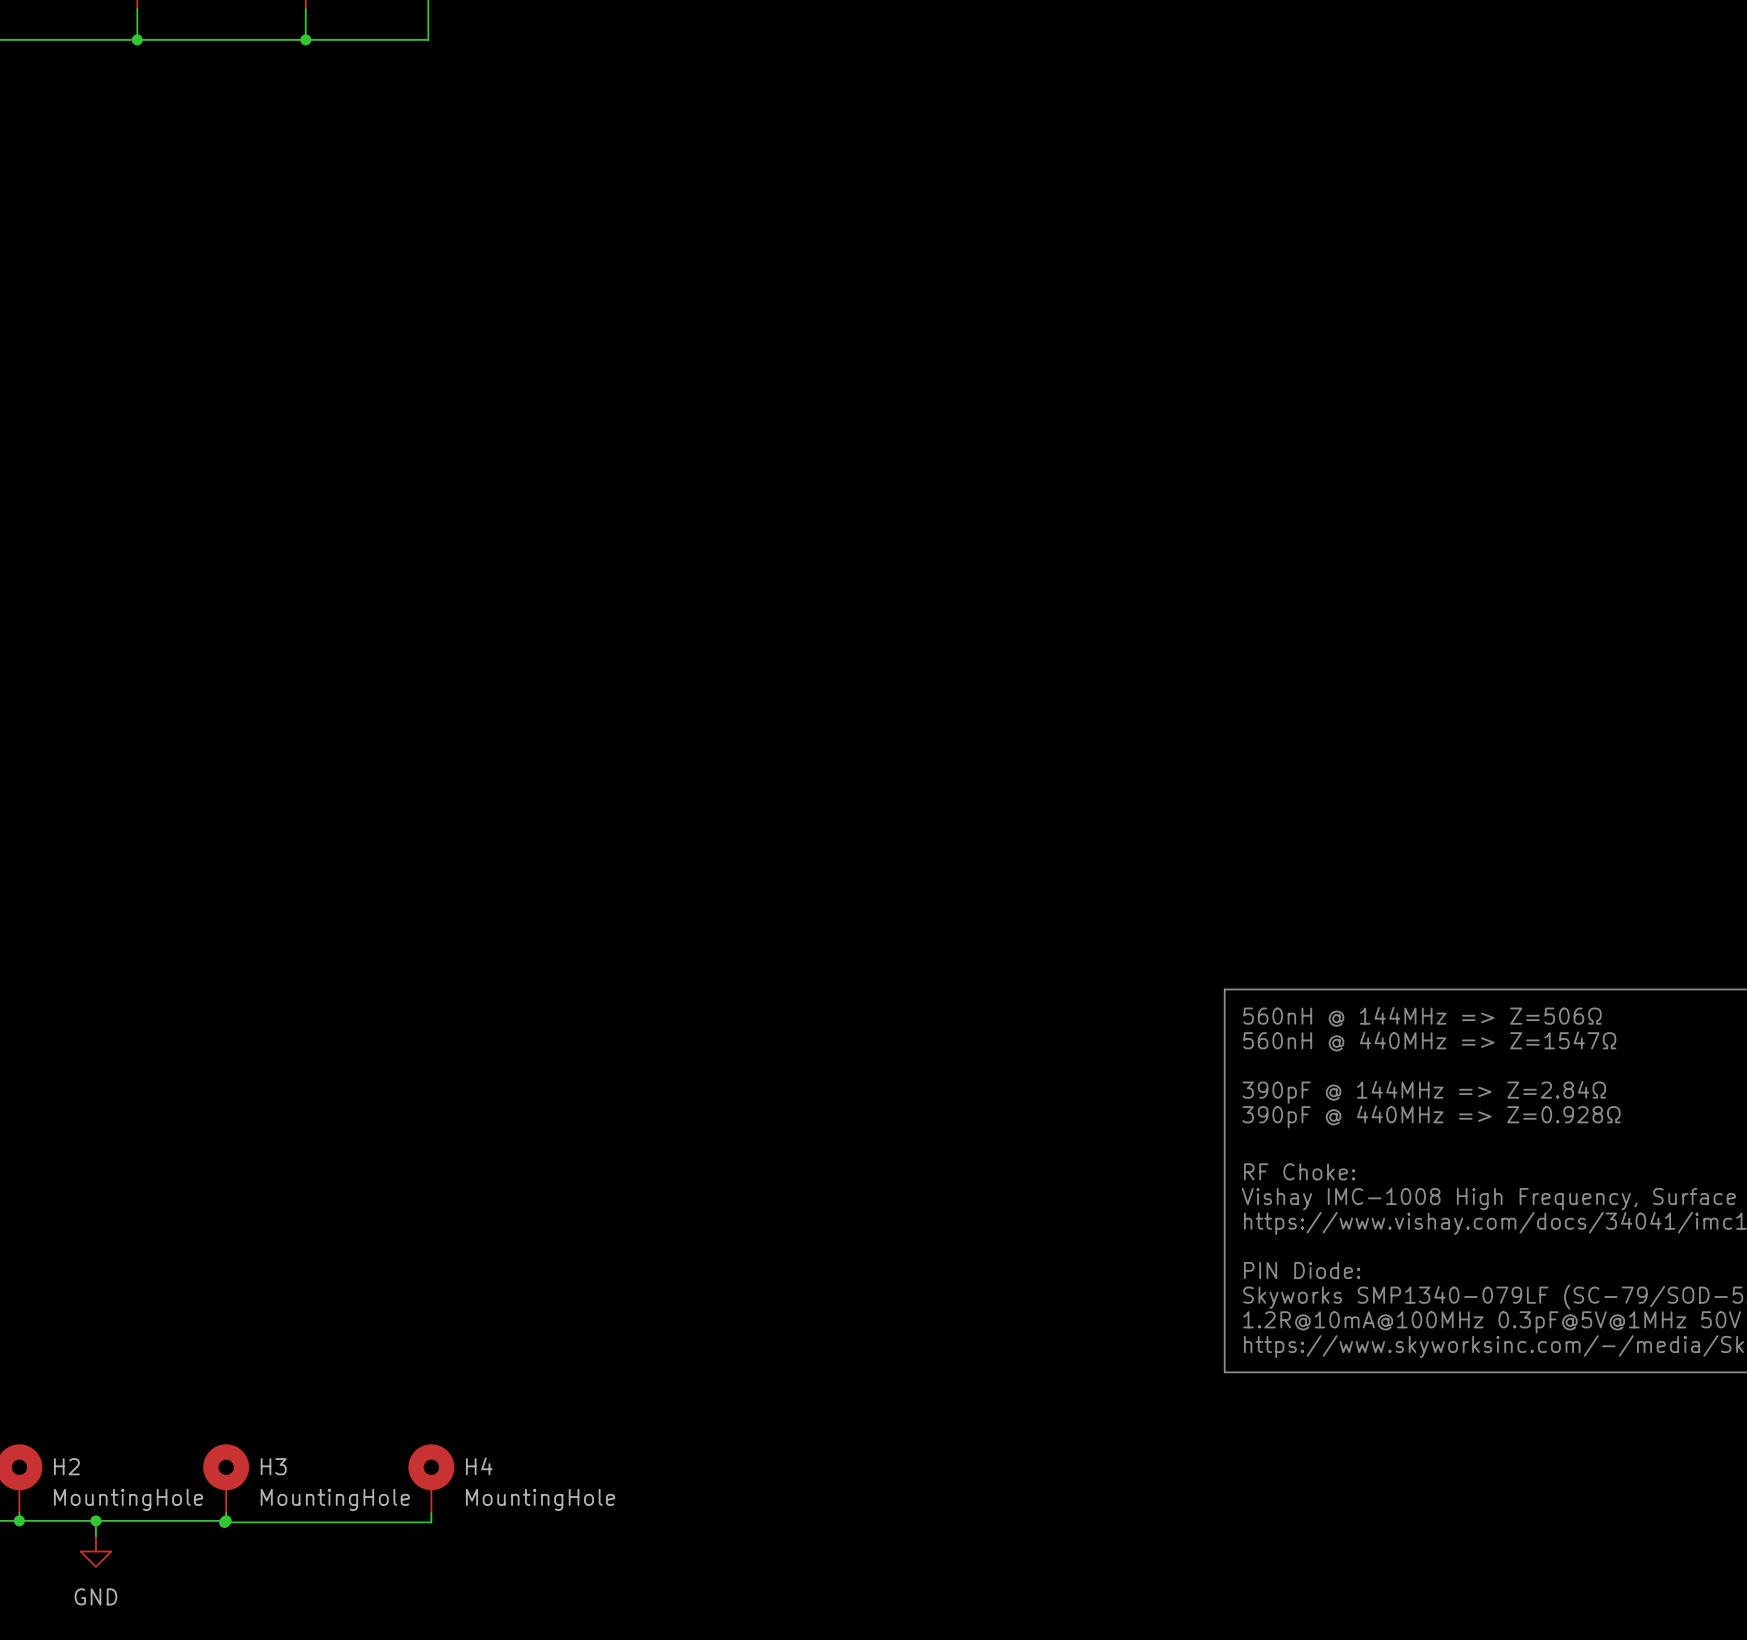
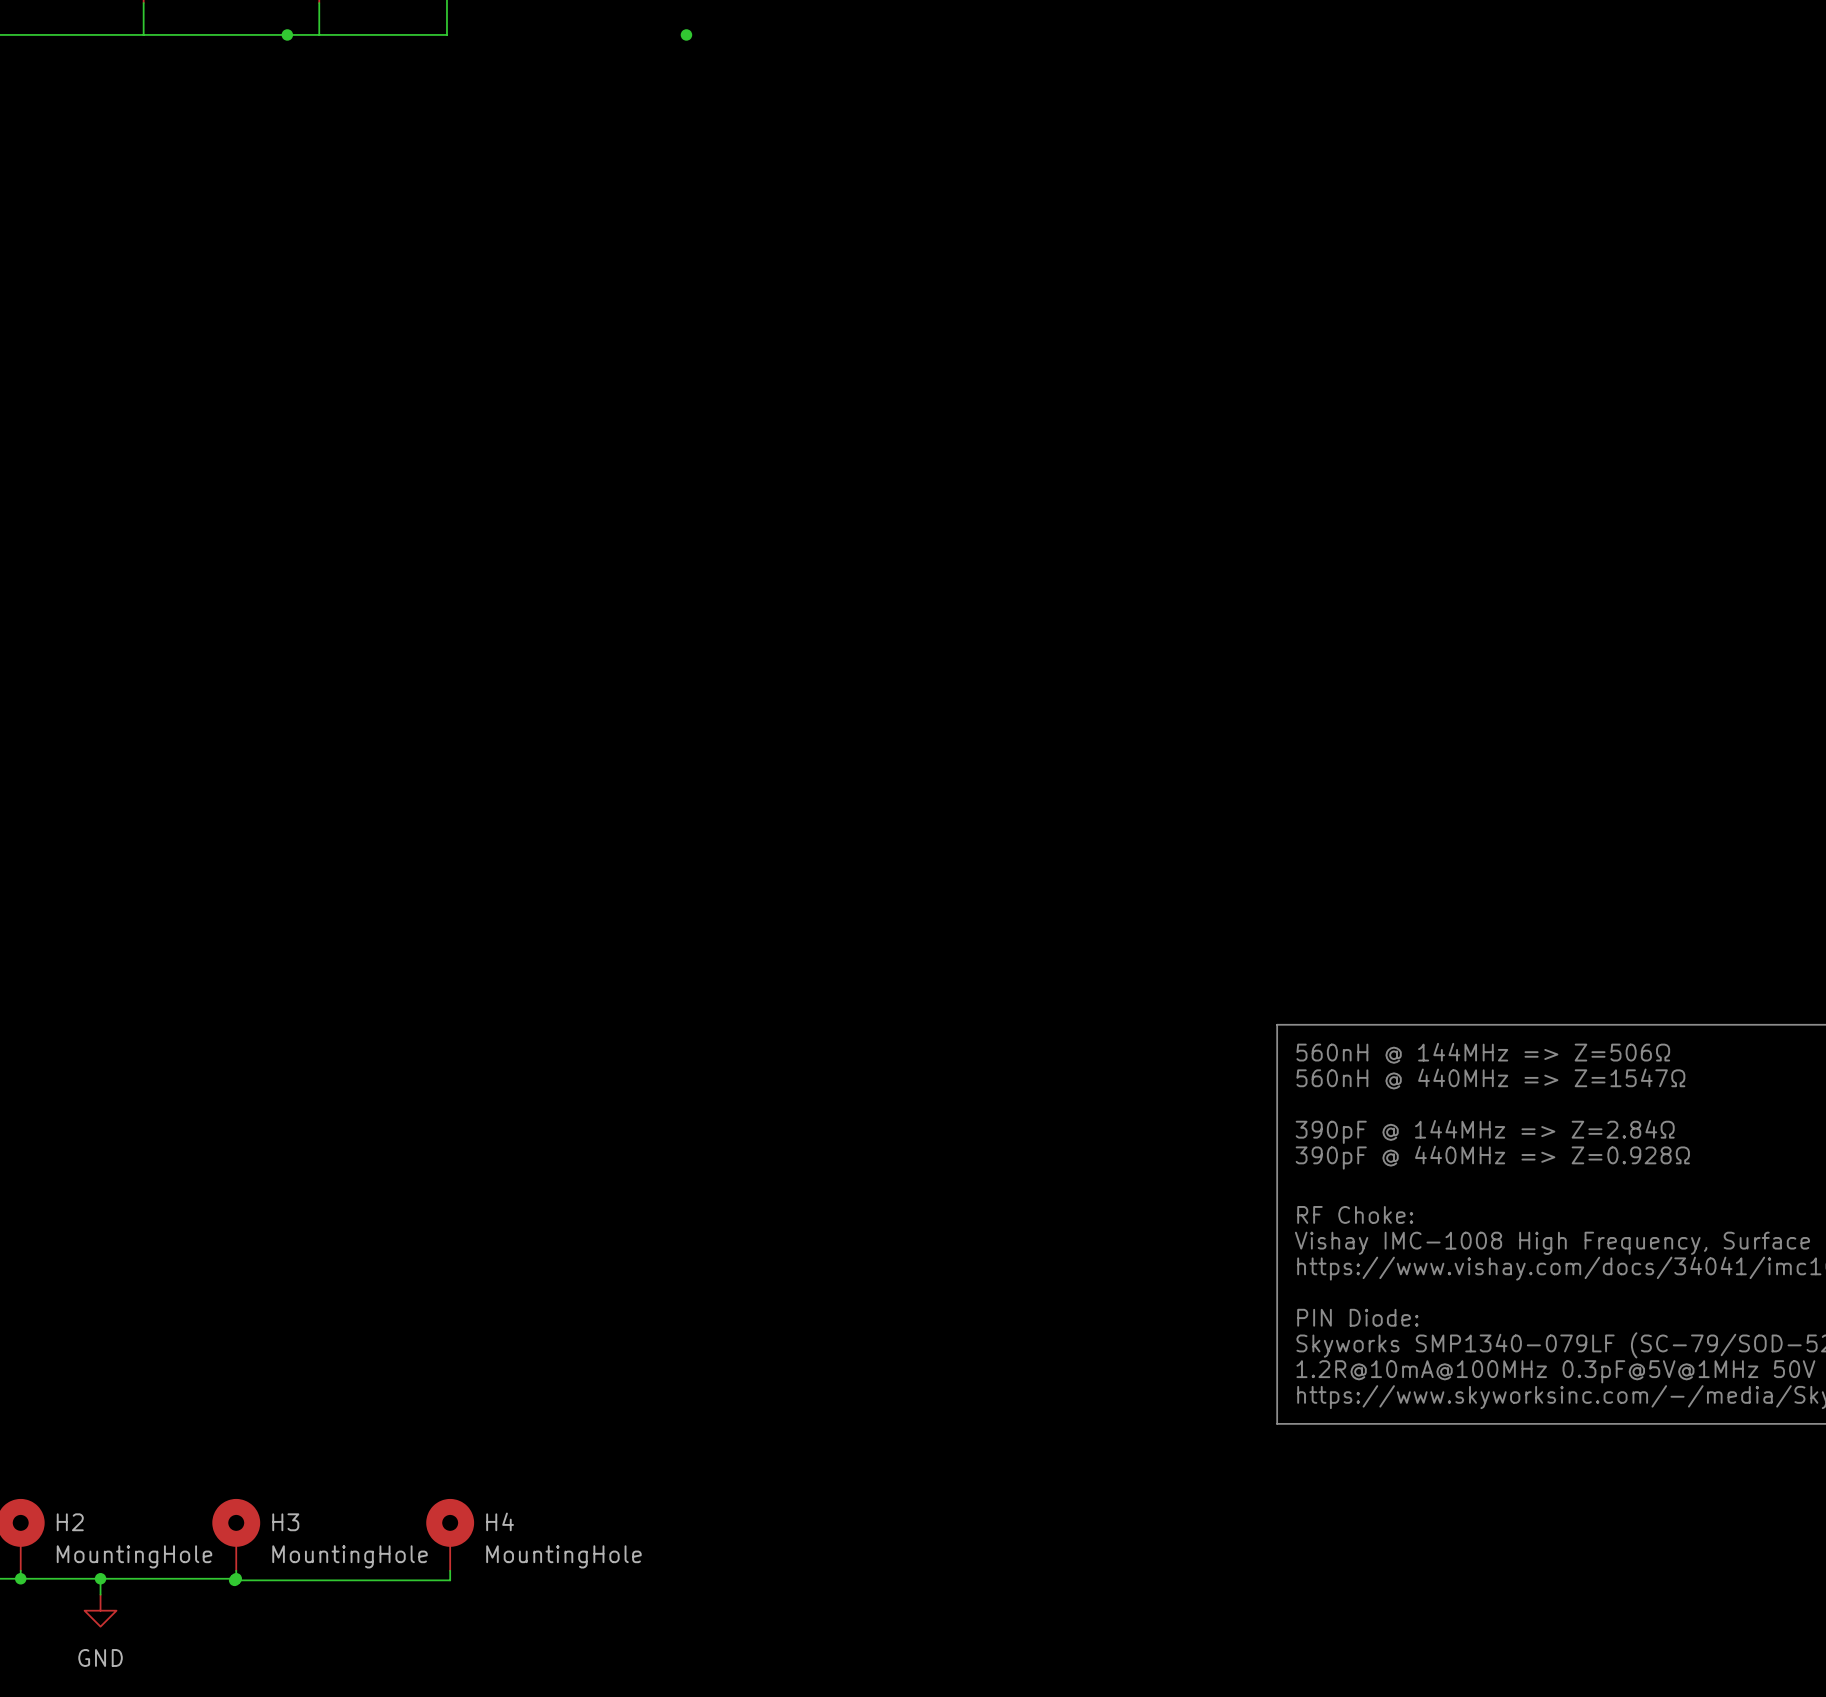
junction: (137, 39) -> none
junction position: (305, 39) -> (287, 34)
junction: none -> (686, 34)

